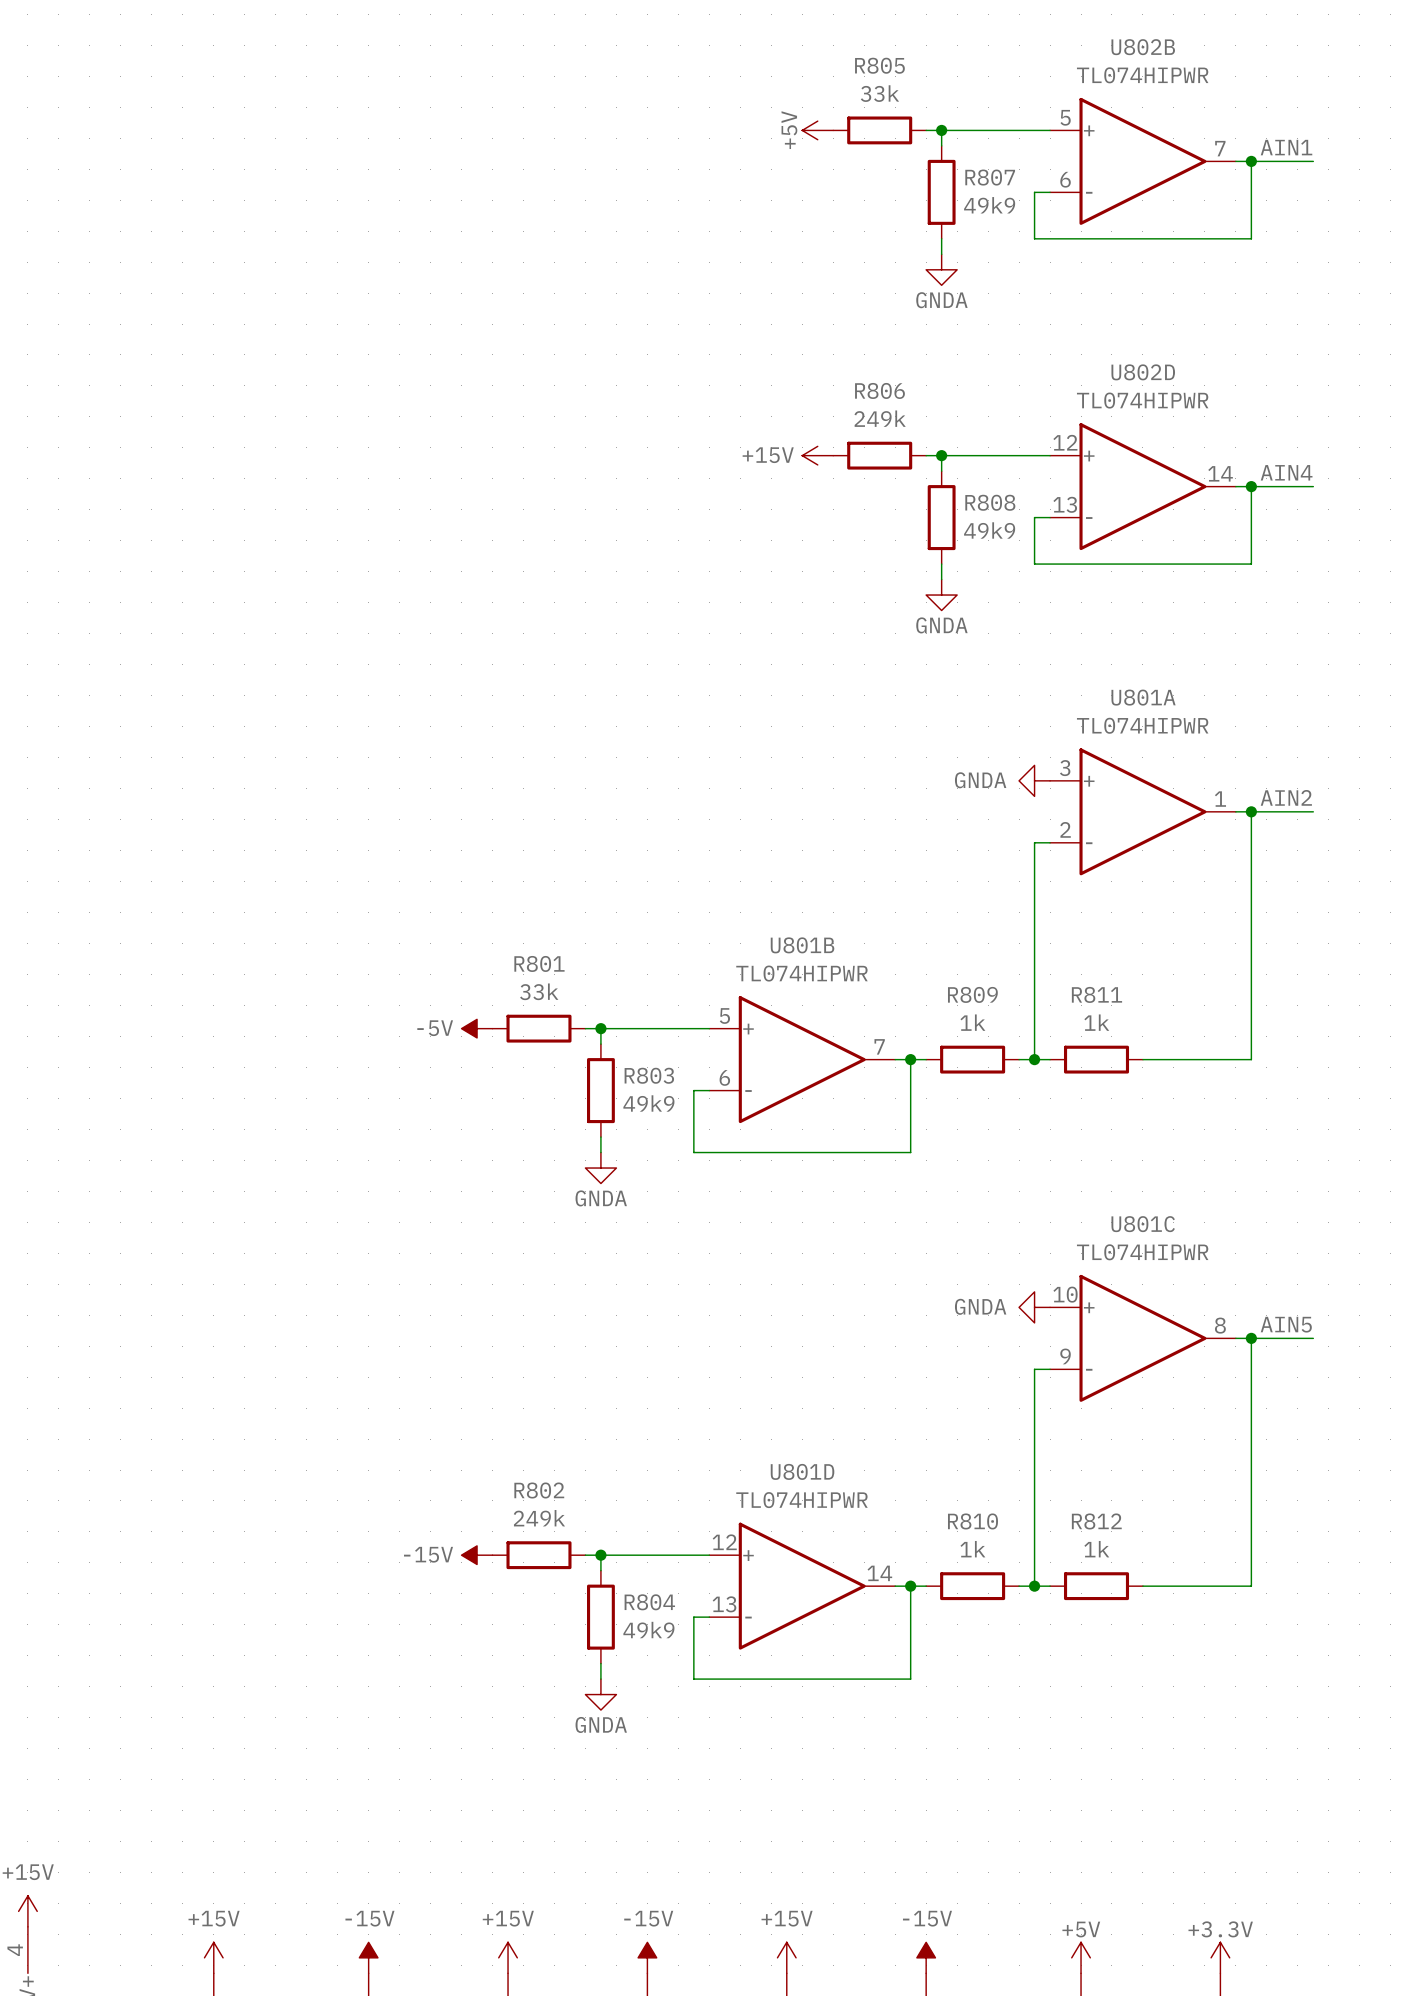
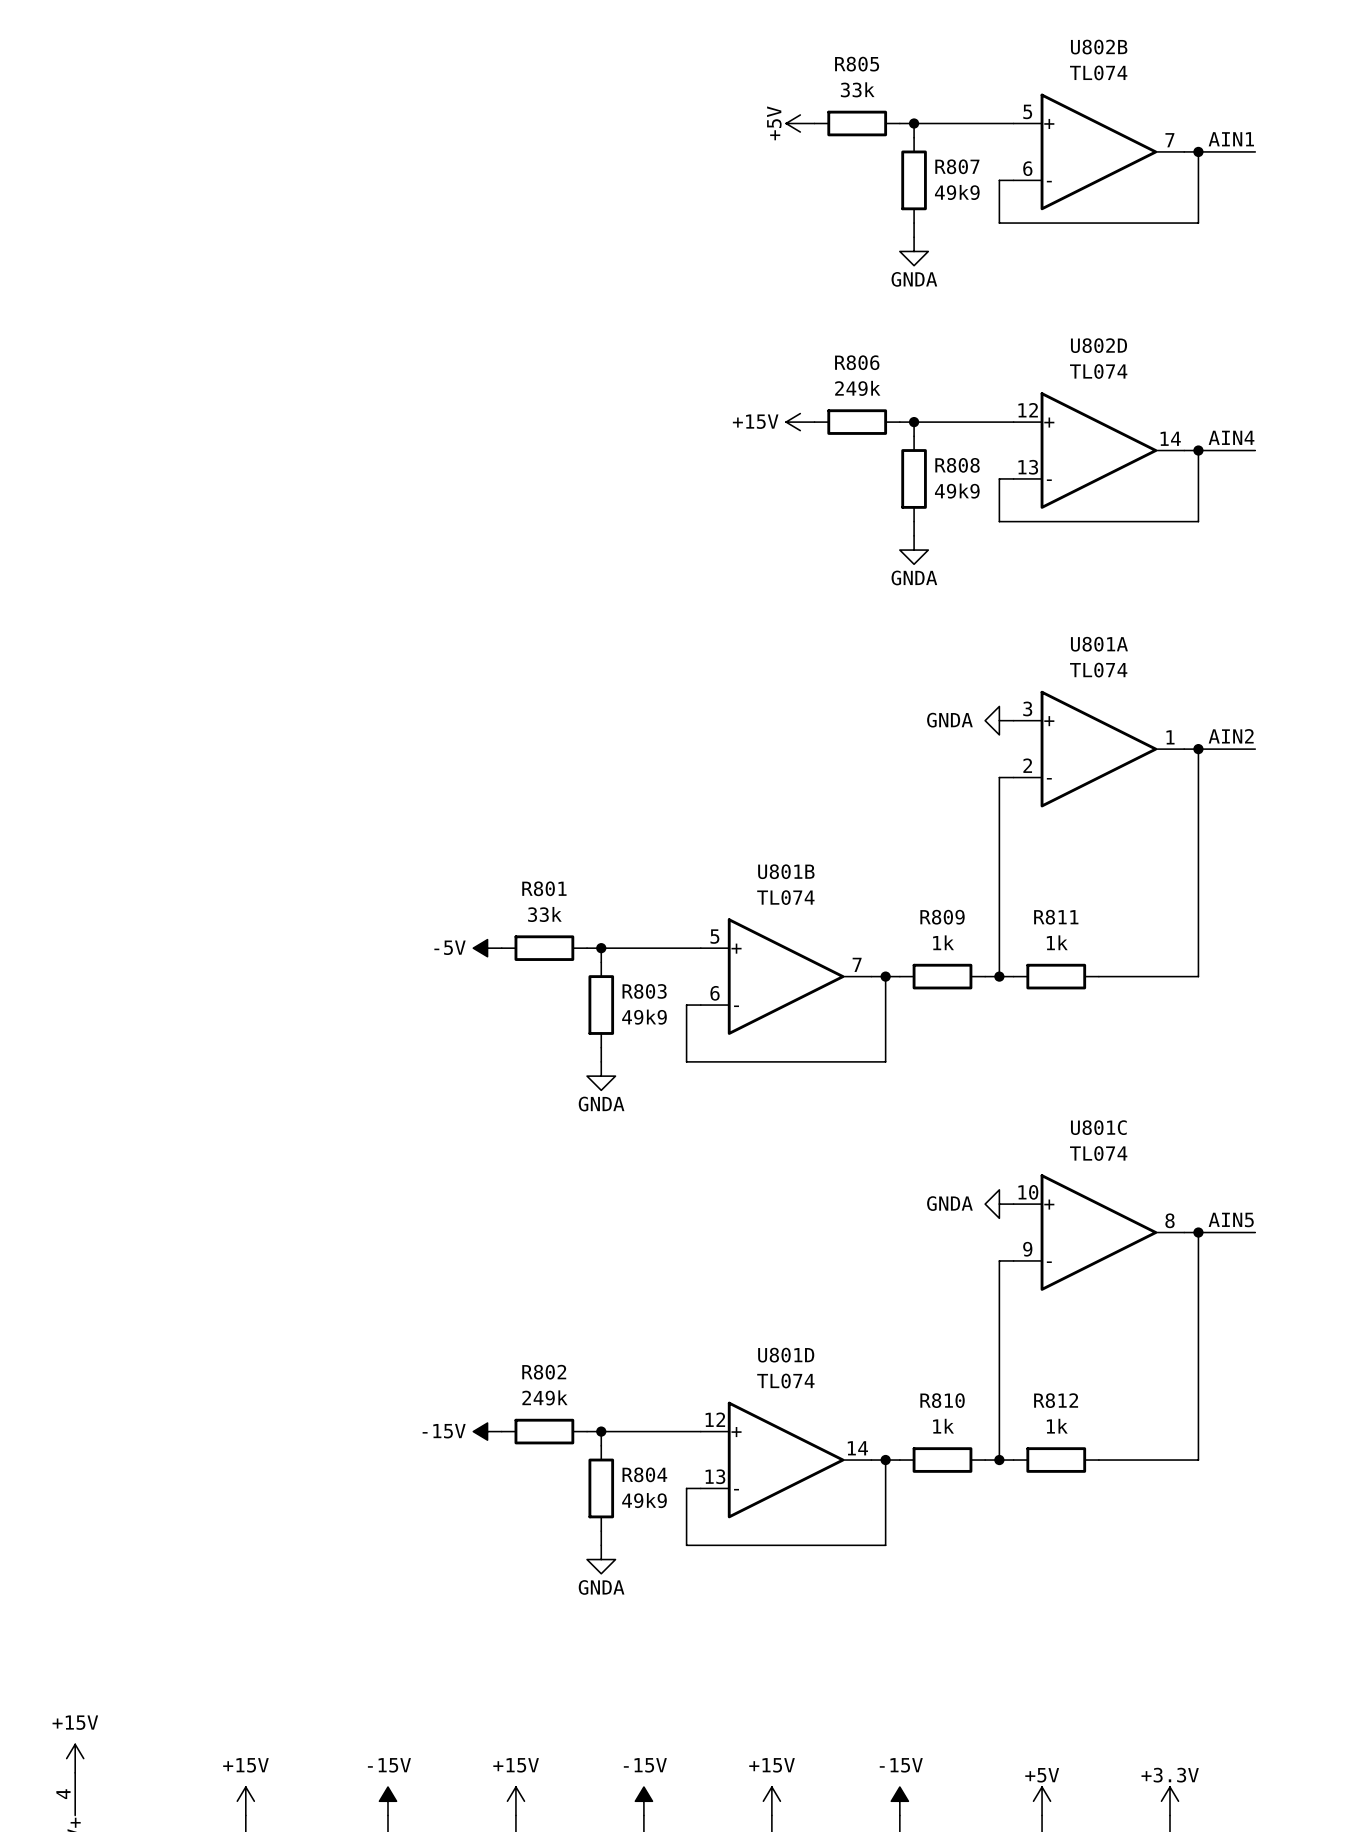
U802B value: TL074HIPWR (1142, 75) -> TL074 (1098, 72)
U802D value: TL074HIPWR (1142, 400) -> TL074 (1098, 371)
U801A value: TL074HIPWR (1142, 725) -> TL074 (1098, 670)
U801B value: TL074HIPWR (801, 973) -> TL074 (785, 897)
U801C value: TL074HIPWR (1142, 1252) -> TL074 (1098, 1153)
U801D value: TL074HIPWR (801, 1500) -> TL074 (785, 1381)

